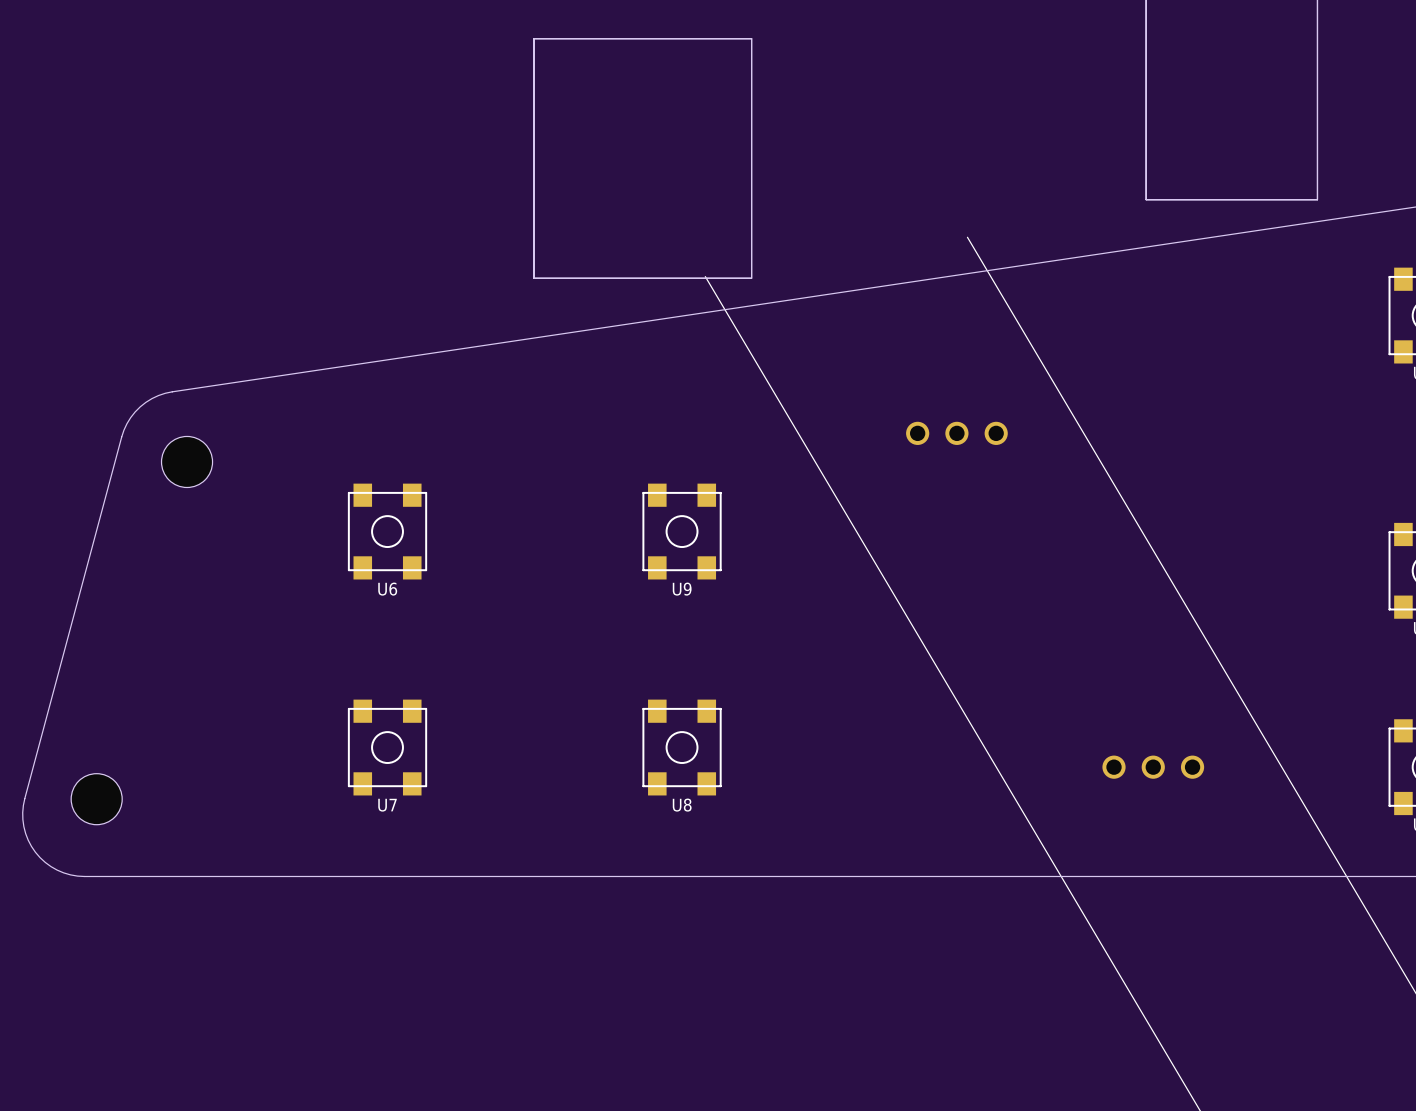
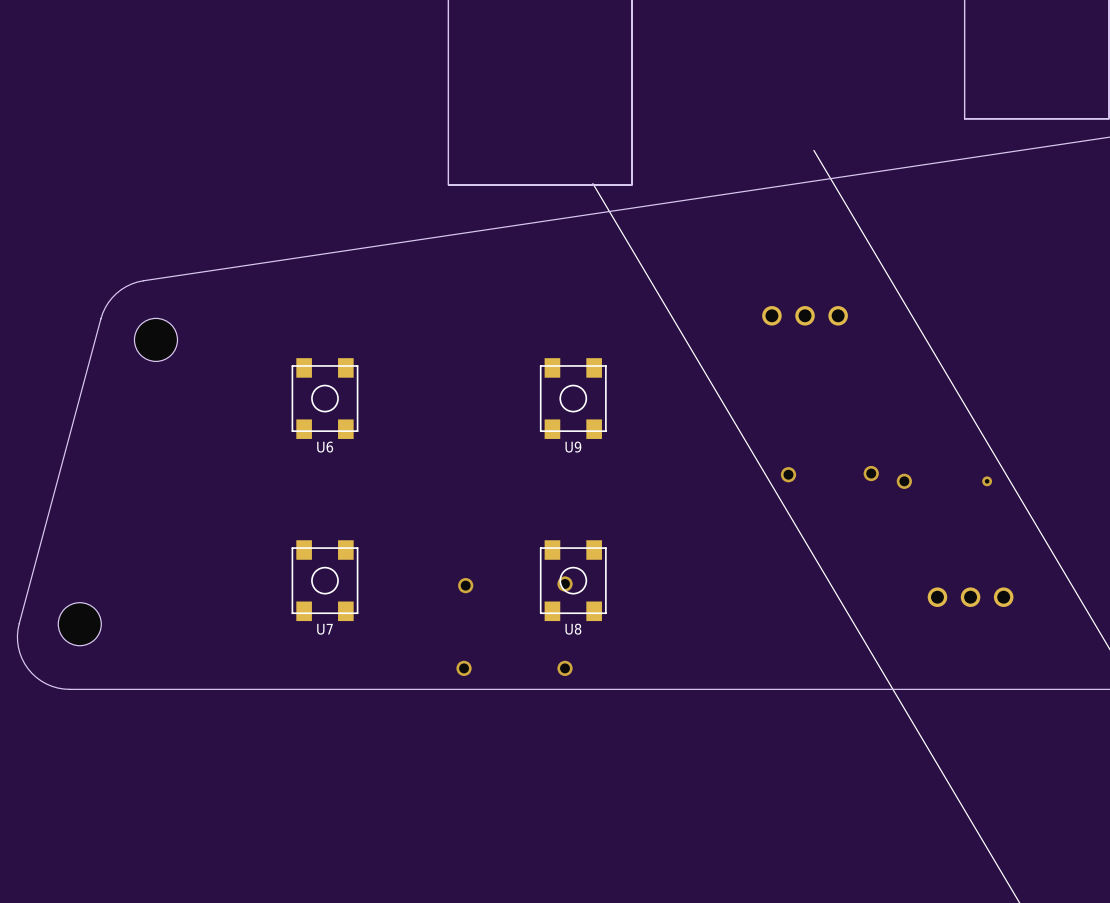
via: none -> (871, 473)
via: none -> (788, 474)
via: none -> (904, 481)
via: none -> (987, 481)
via: none -> (565, 583)
via: none -> (465, 585)
via: none -> (464, 668)
via: none -> (565, 668)

